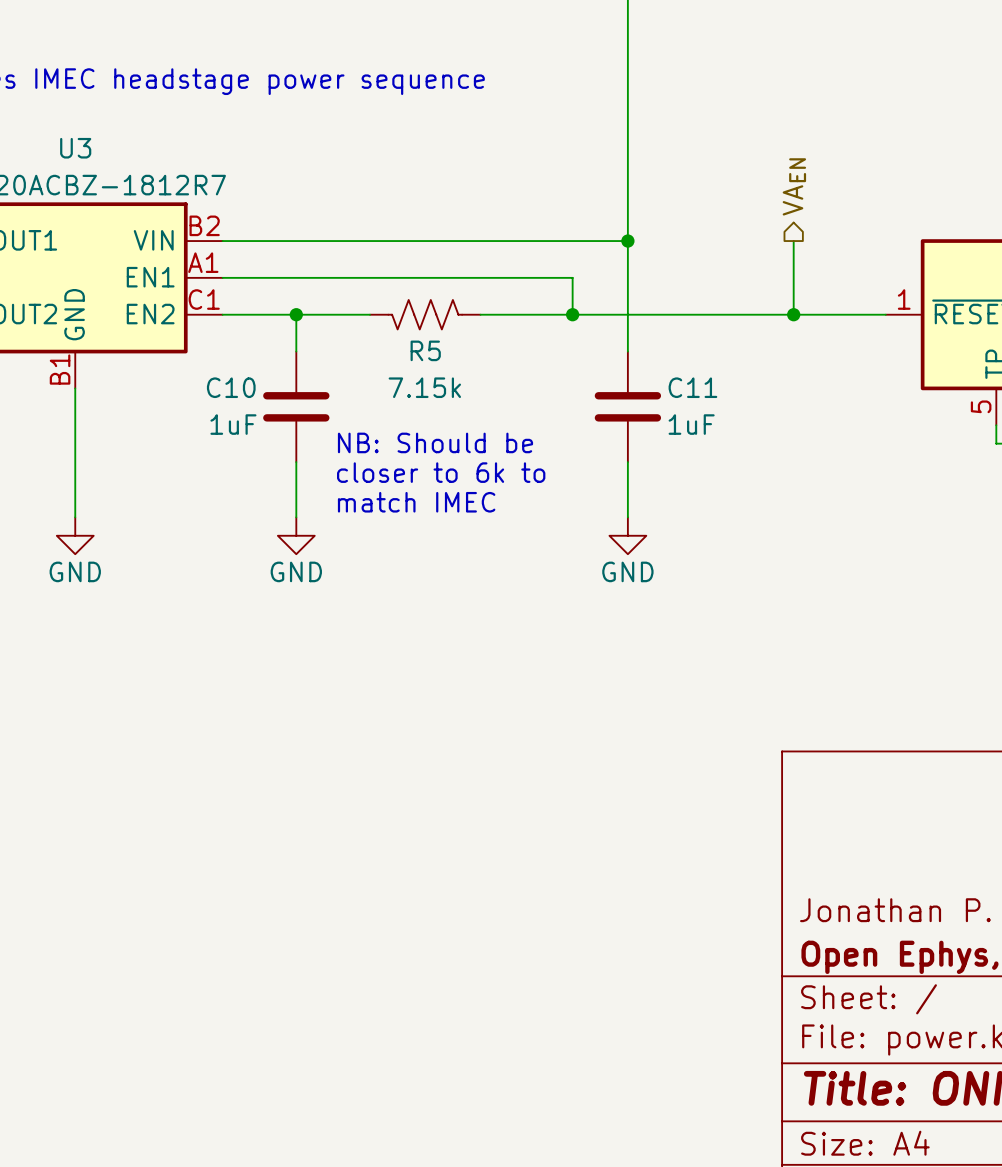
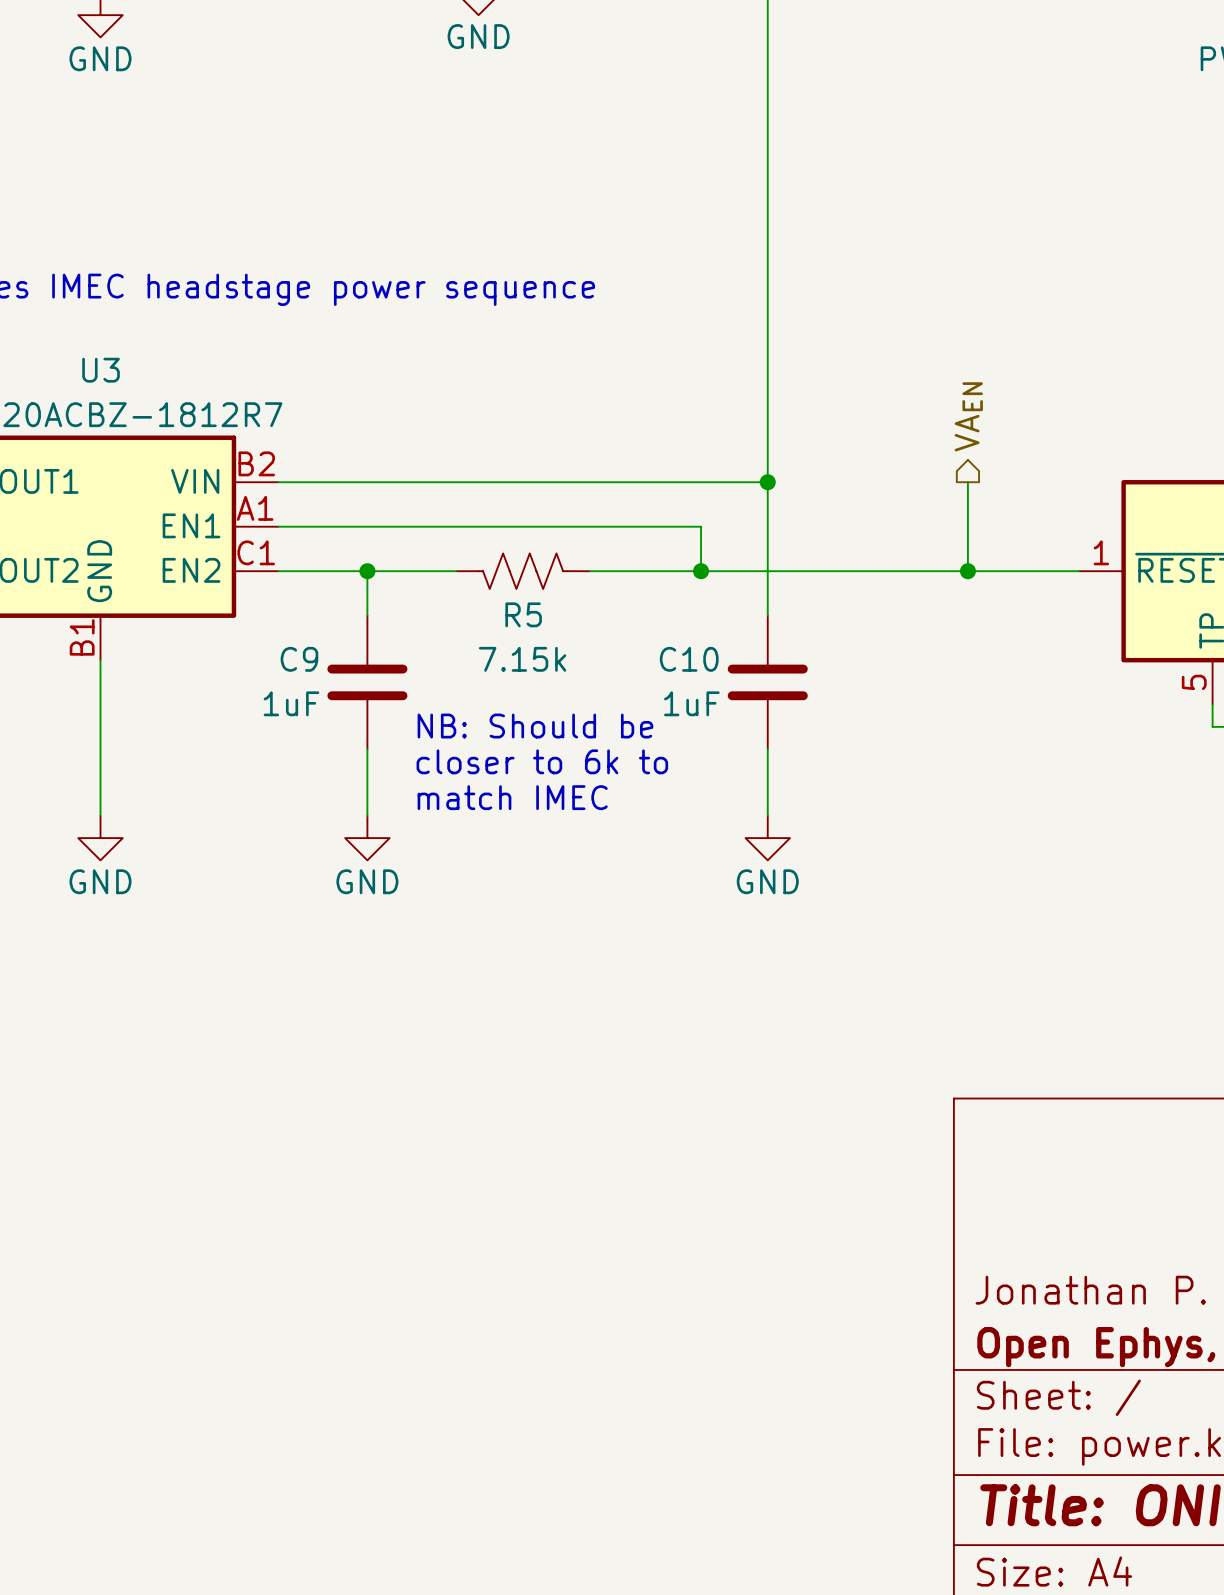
C10 name: C10 (231, 387) -> C9 (299, 659)
C11 name: C11 (692, 387) -> C10 (689, 659)
C11 value position: 1uF (691, 424) -> 1uF (691, 703)

